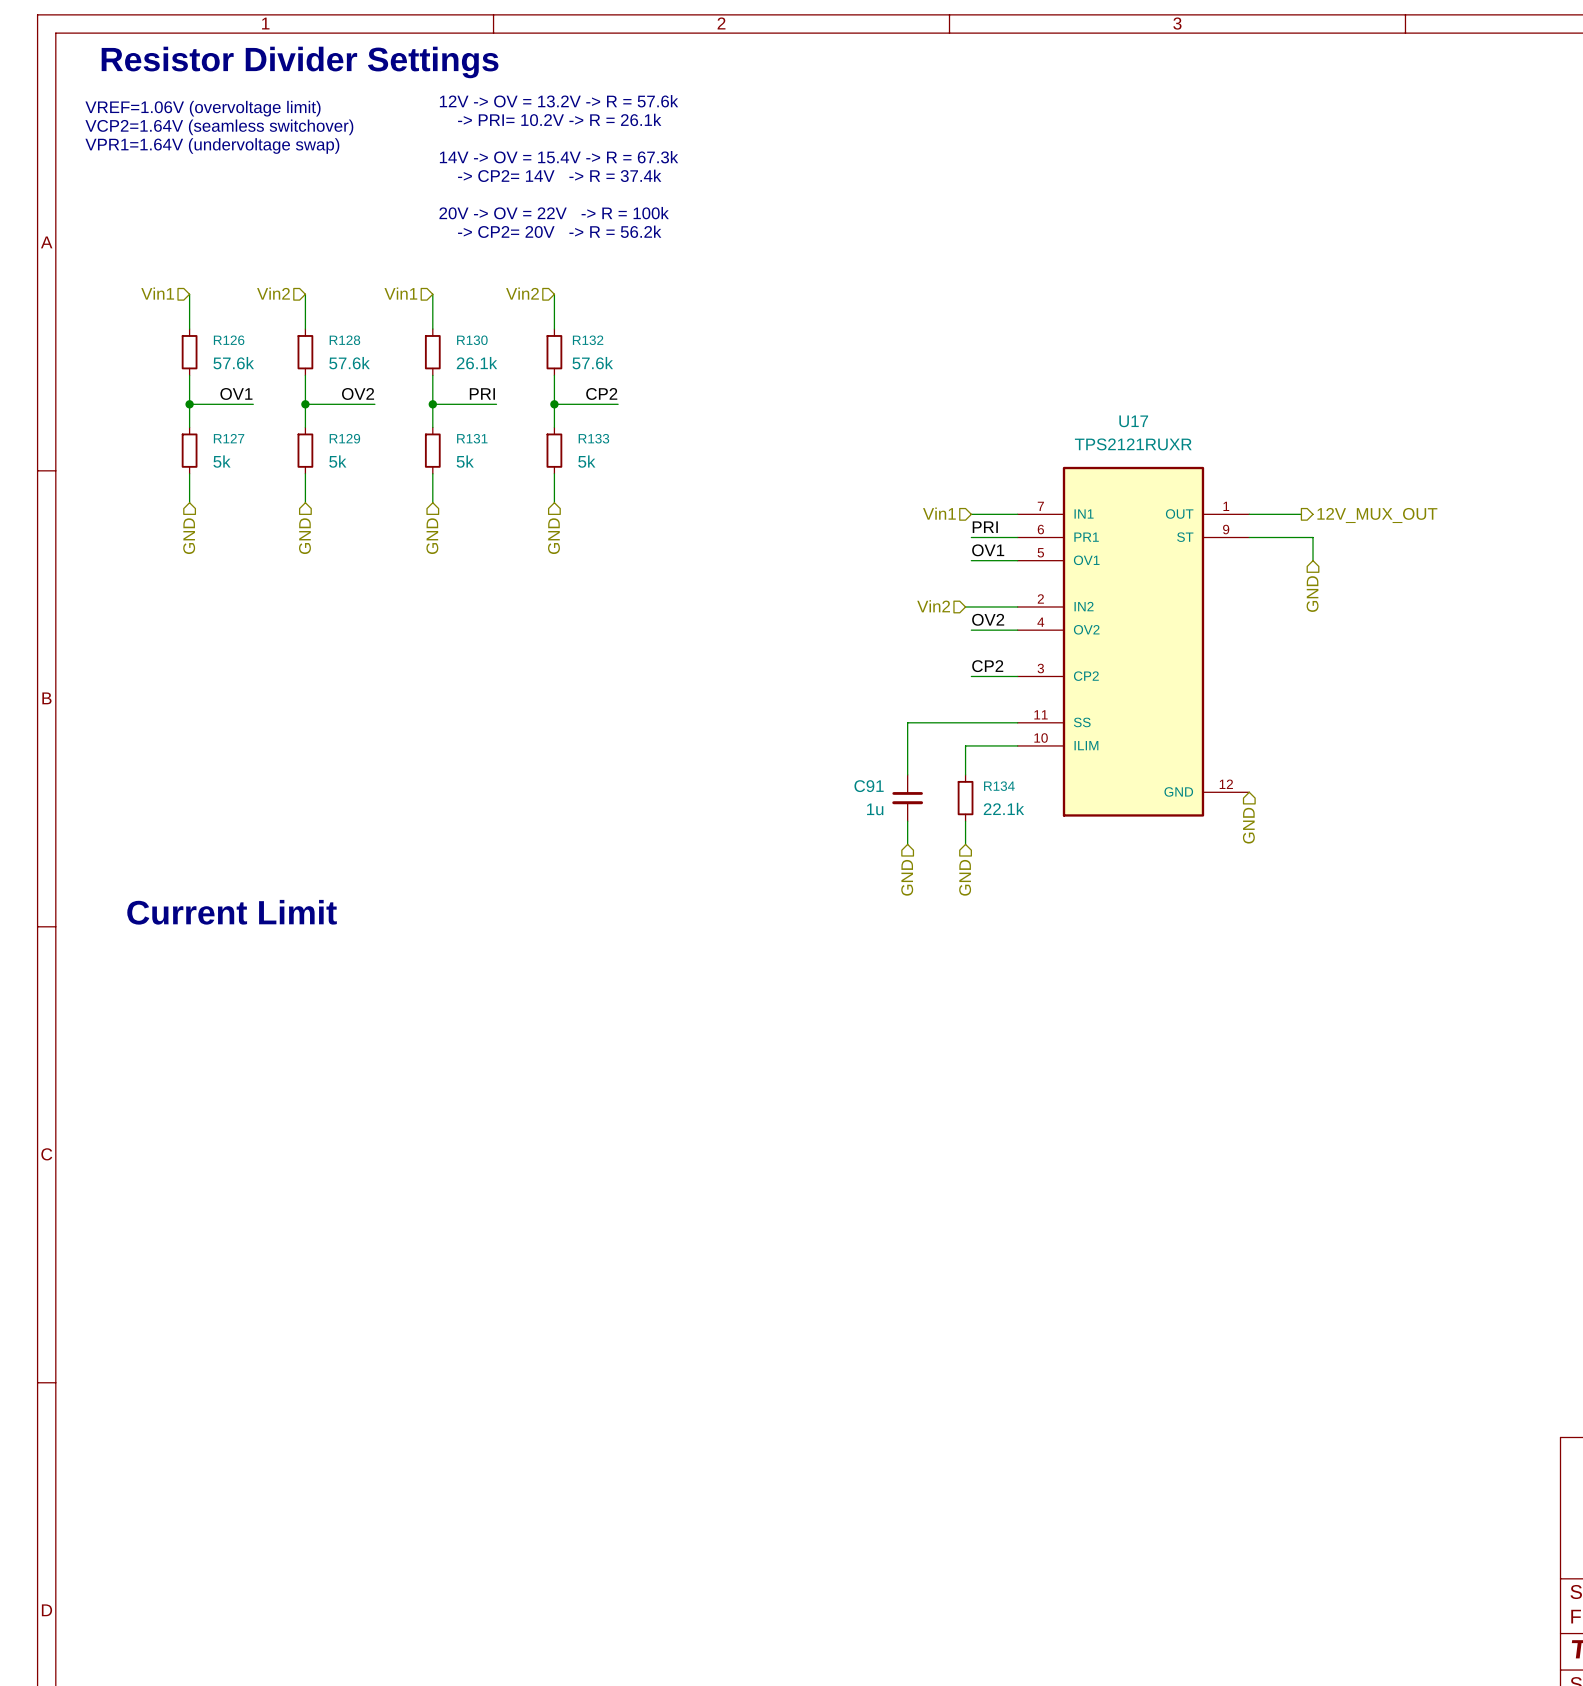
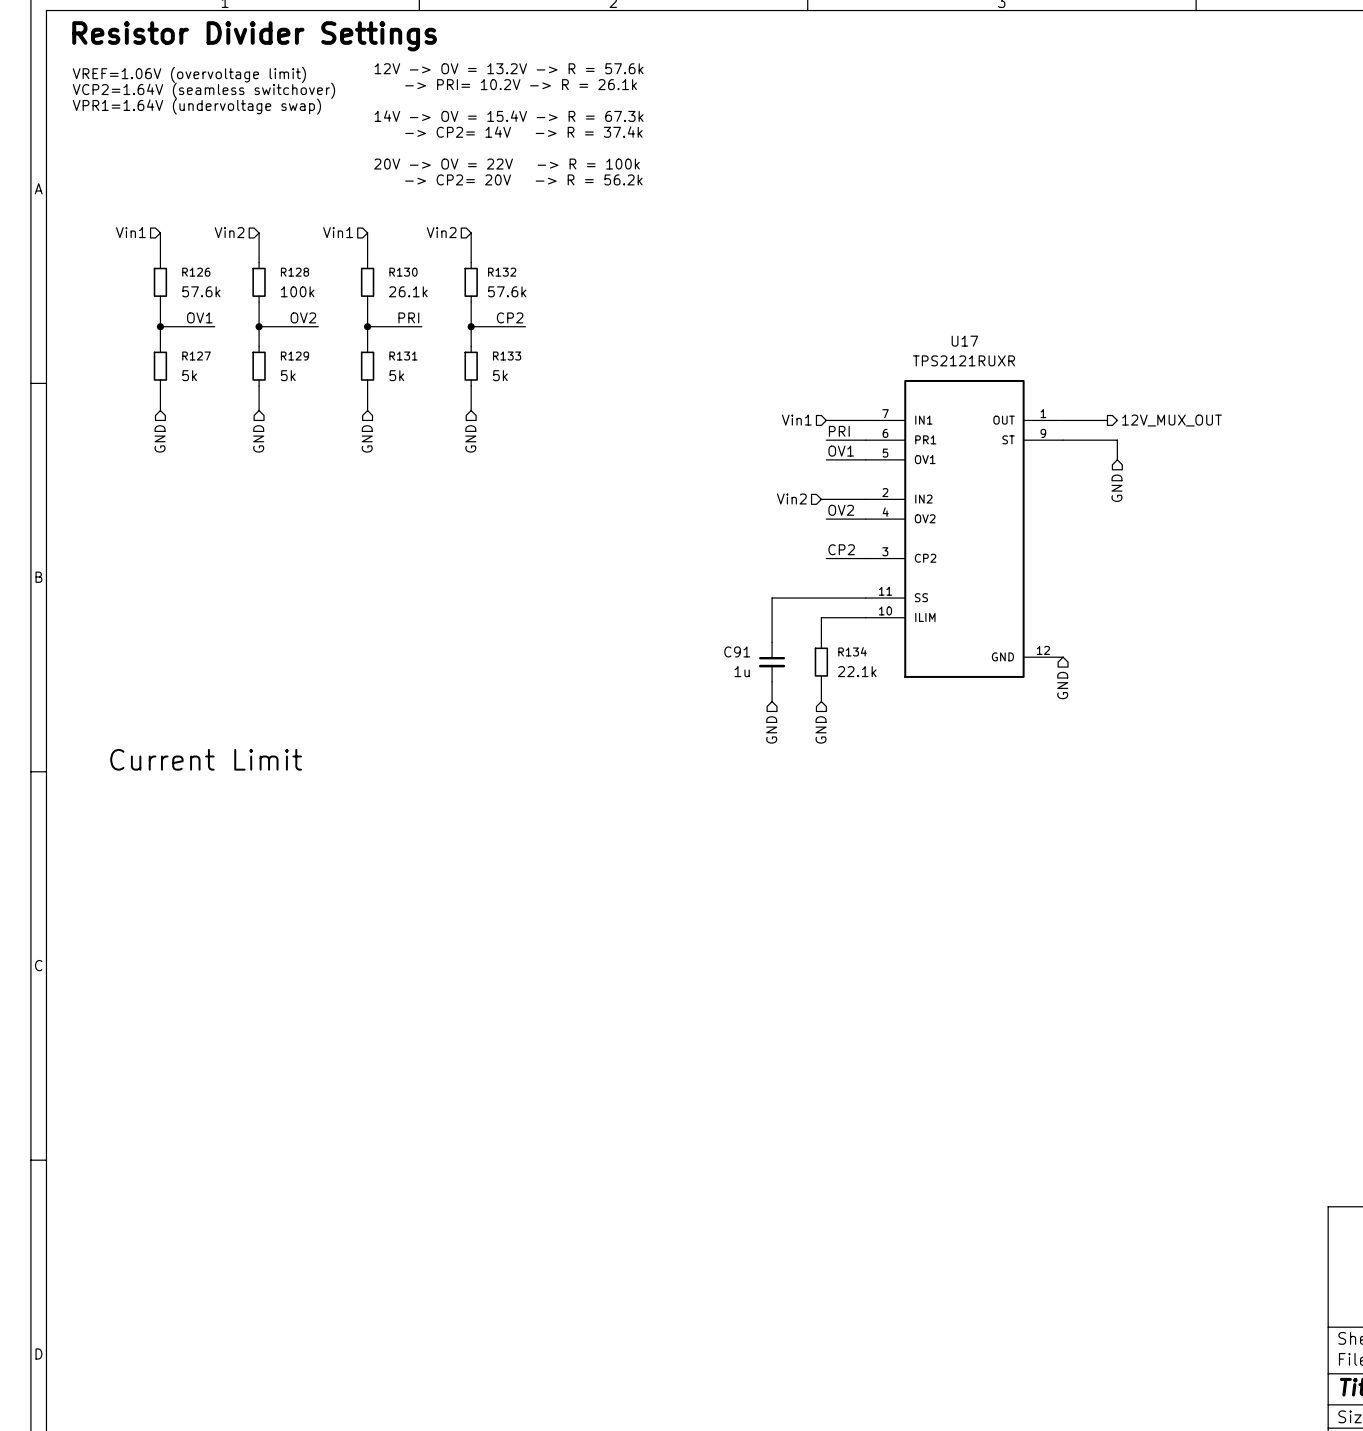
R128 value: 57.6k (349, 363) -> 100k (297, 291)

